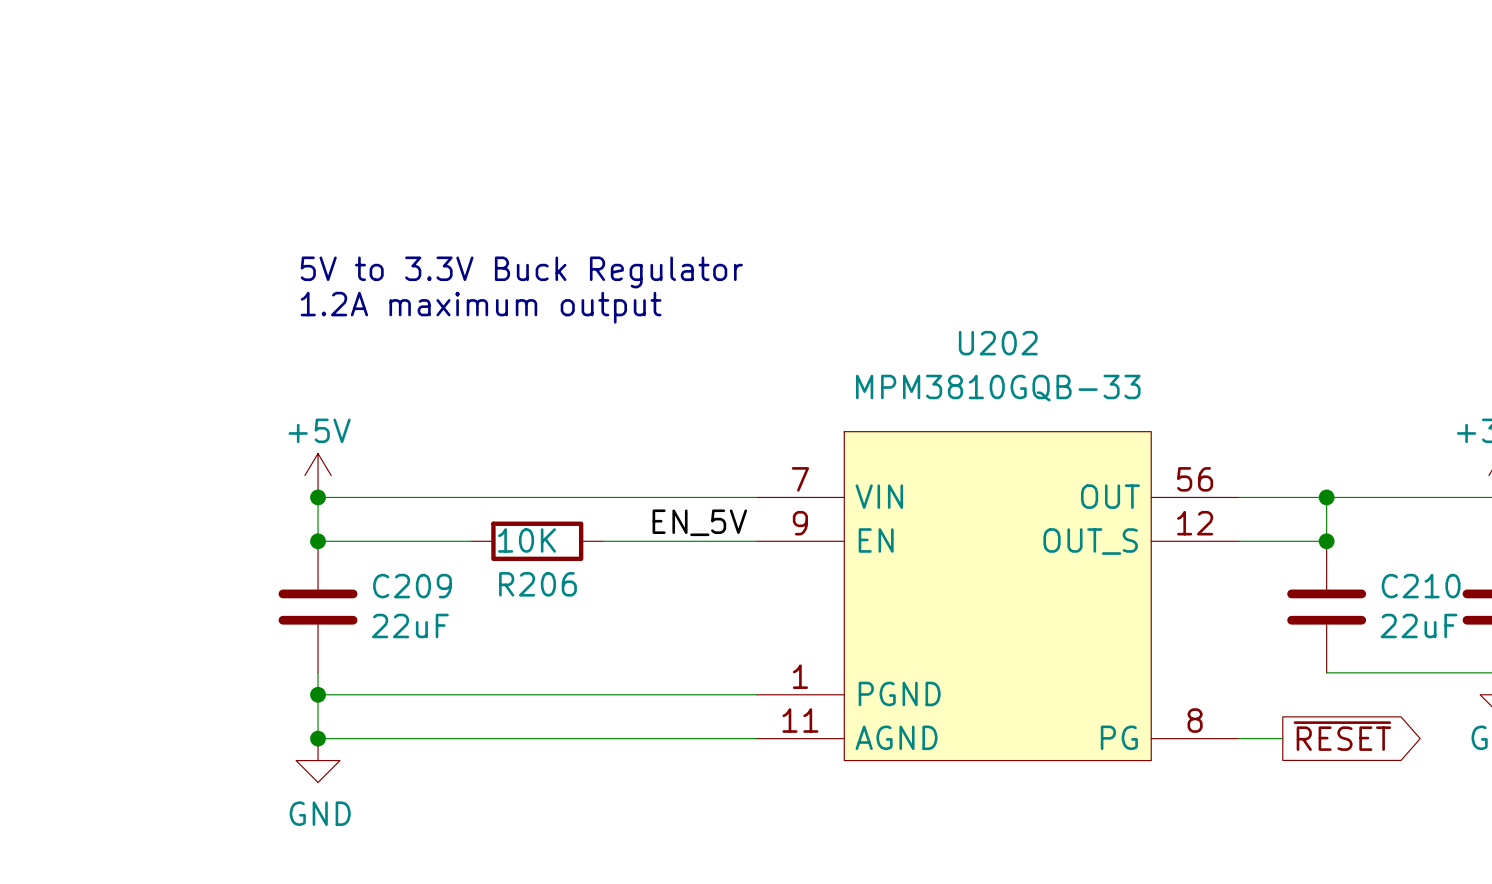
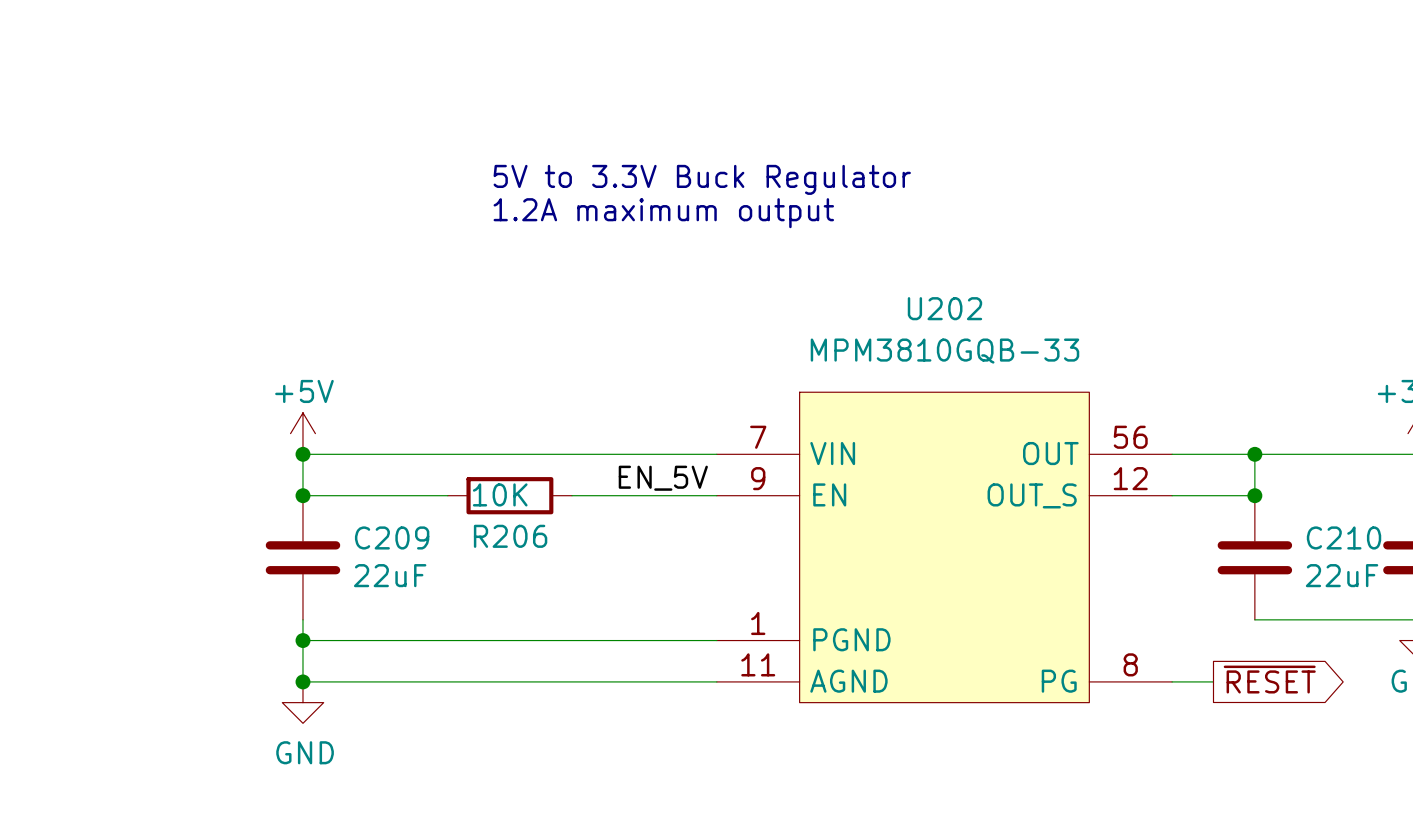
text position: 5V to 3.3V Buck Regulator (521, 272) -> 5V to 3.3V Buck Regulator (702, 179)
text position: 1.2A maximum output (481, 307) -> 1.2A maximum output (663, 213)

